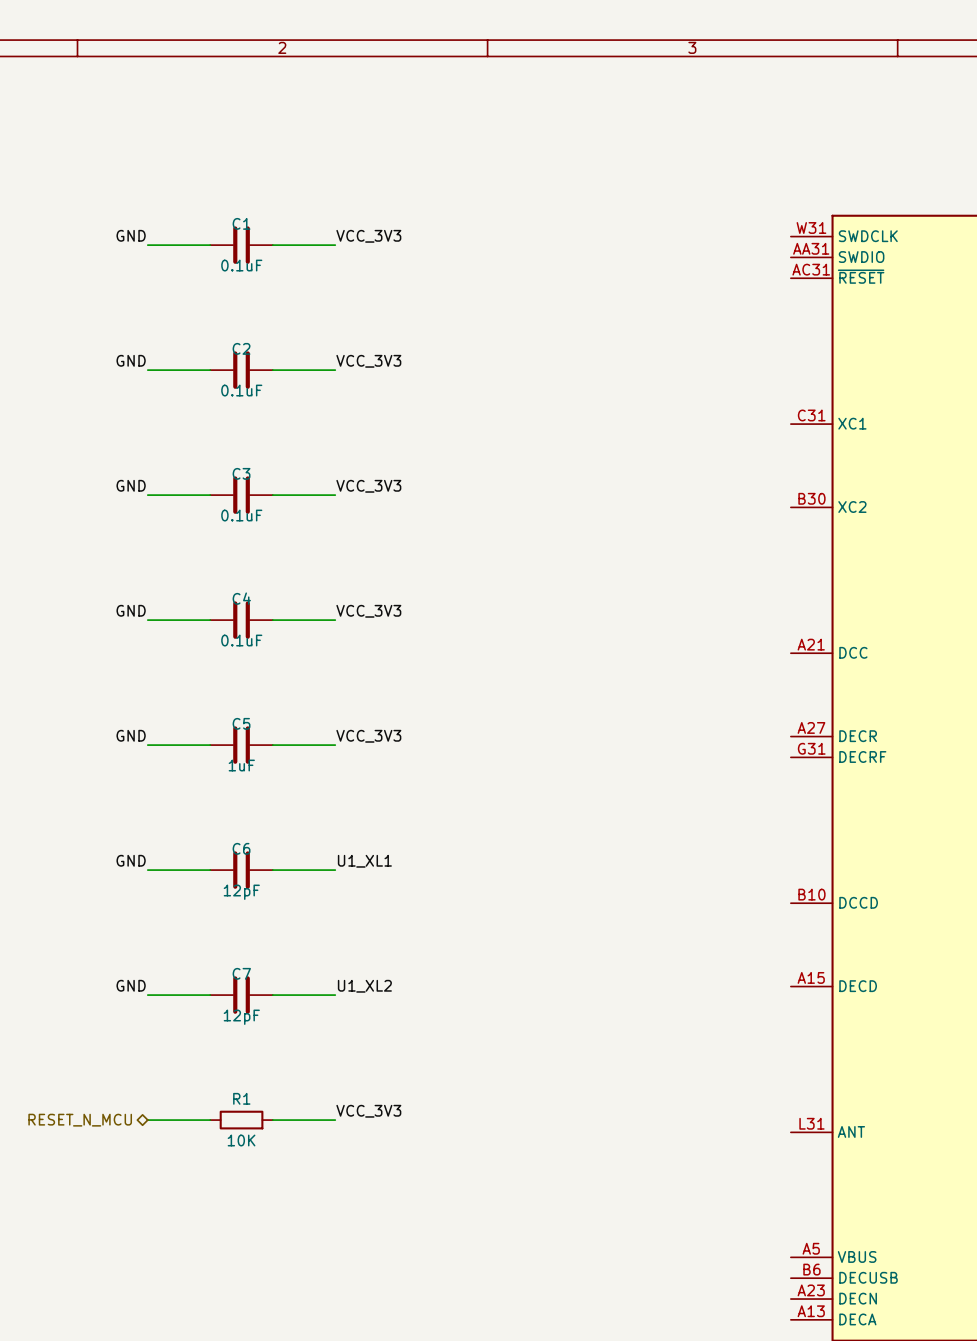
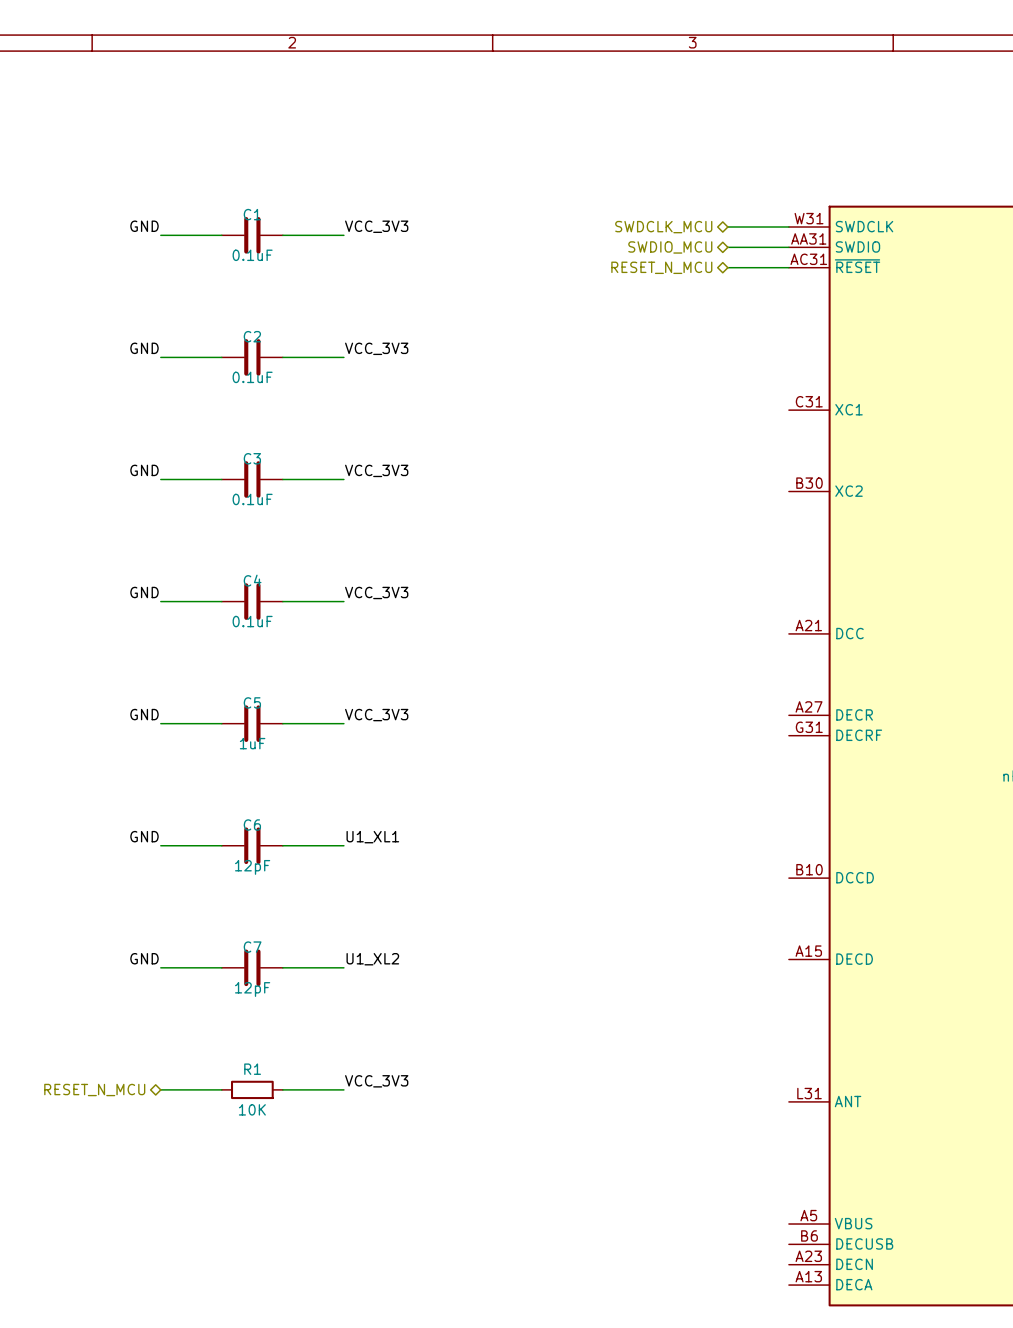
hierarchical label: none -> SWDCLK_MCU (663, 227)
wire: none -> (727, 227) (788, 227)
hierarchical label: none -> SWDIO_MCU (670, 247)
wire: none -> (727, 247) (788, 247)
hierarchical label: none -> RESET_N_MCU (661, 267)
wire: none -> (727, 267) (788, 267)

